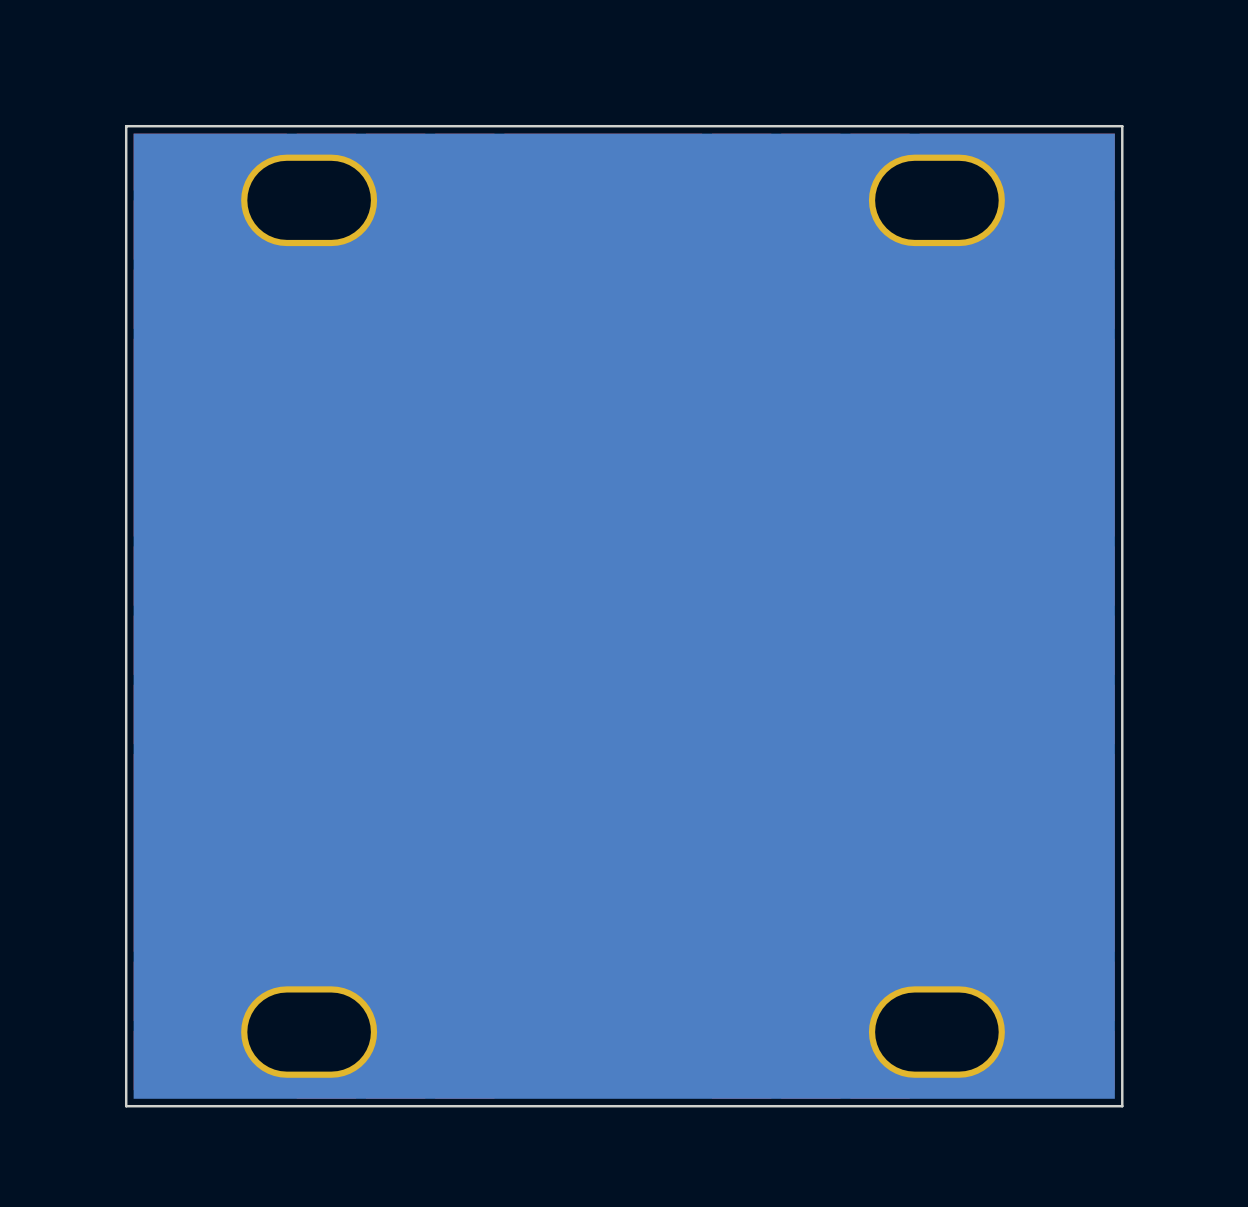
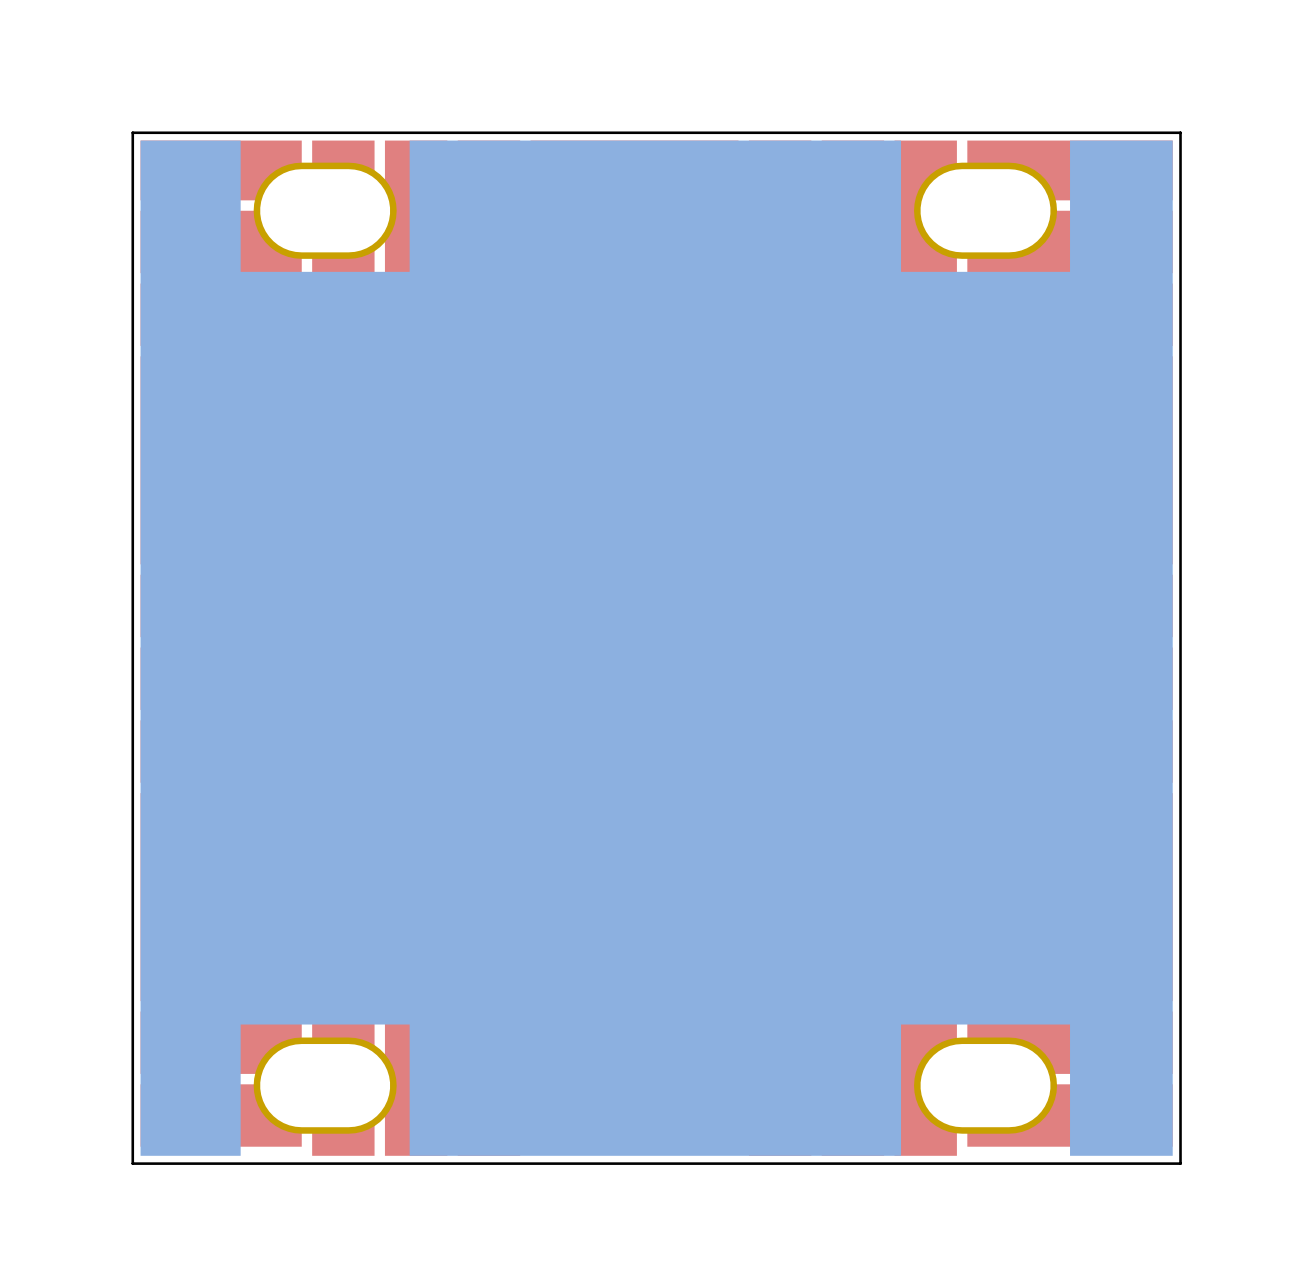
drawing shape: [133, 133, 1115, 1099] -> [240, 271, 1071, 1025]
drawing: none -> [140, 140, 241, 1156]
drawing: none -> [409, 140, 902, 272]
drawing: none -> [1070, 140, 1173, 1156]
drawing: none -> [409, 1024, 902, 1156]

